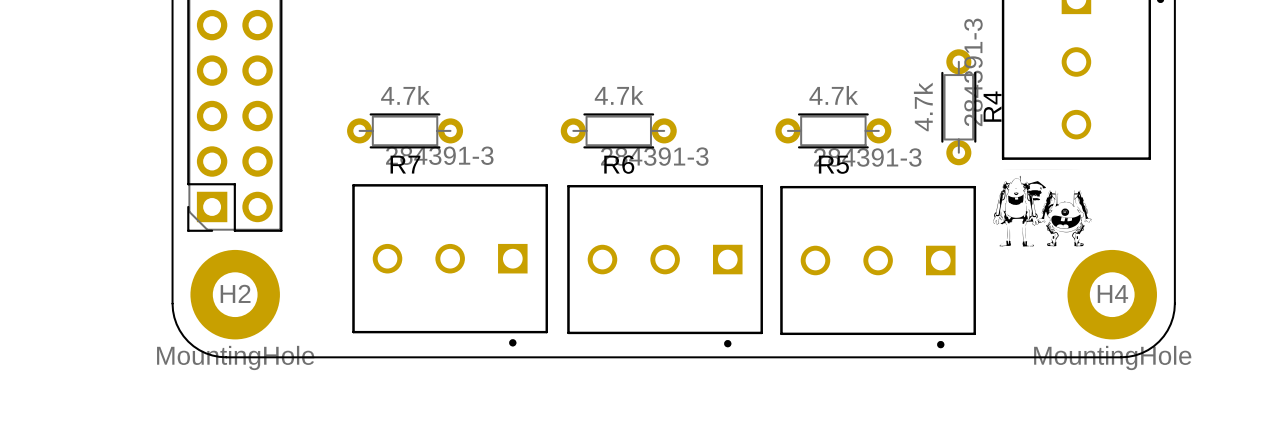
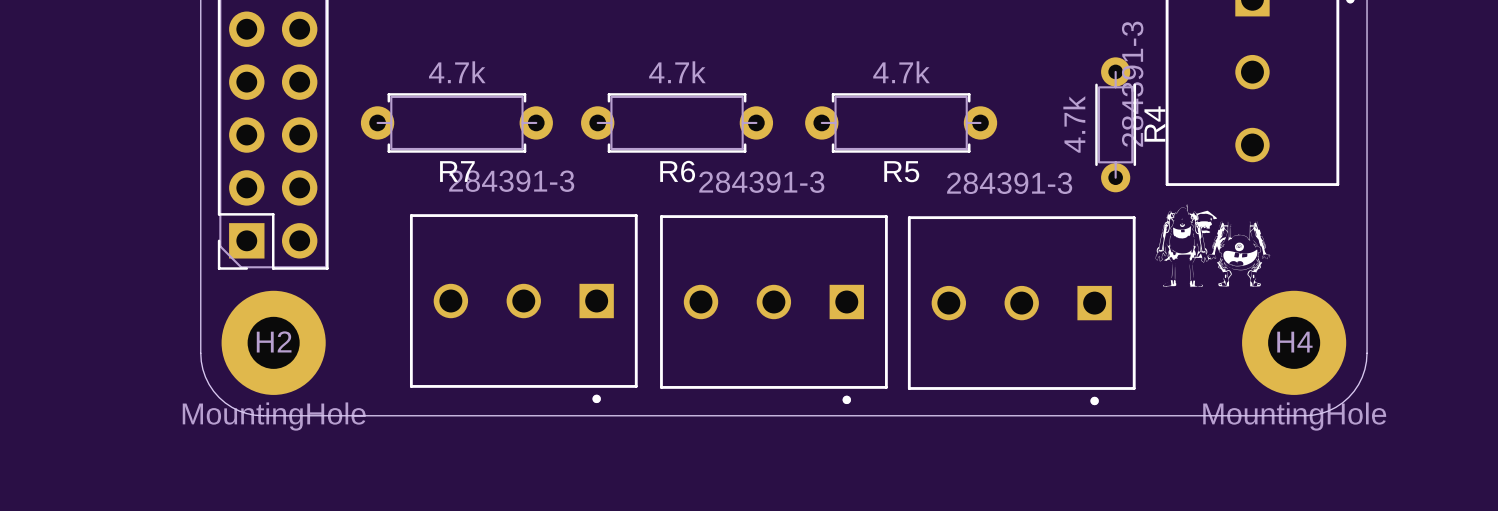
R7 footprint: [347, 113, 464, 149] -> [360, 93, 553, 153]
R6 footprint: [560, 113, 677, 149] -> [581, 93, 774, 153]
R5 footprint: [775, 113, 892, 149] -> [805, 93, 998, 153]

